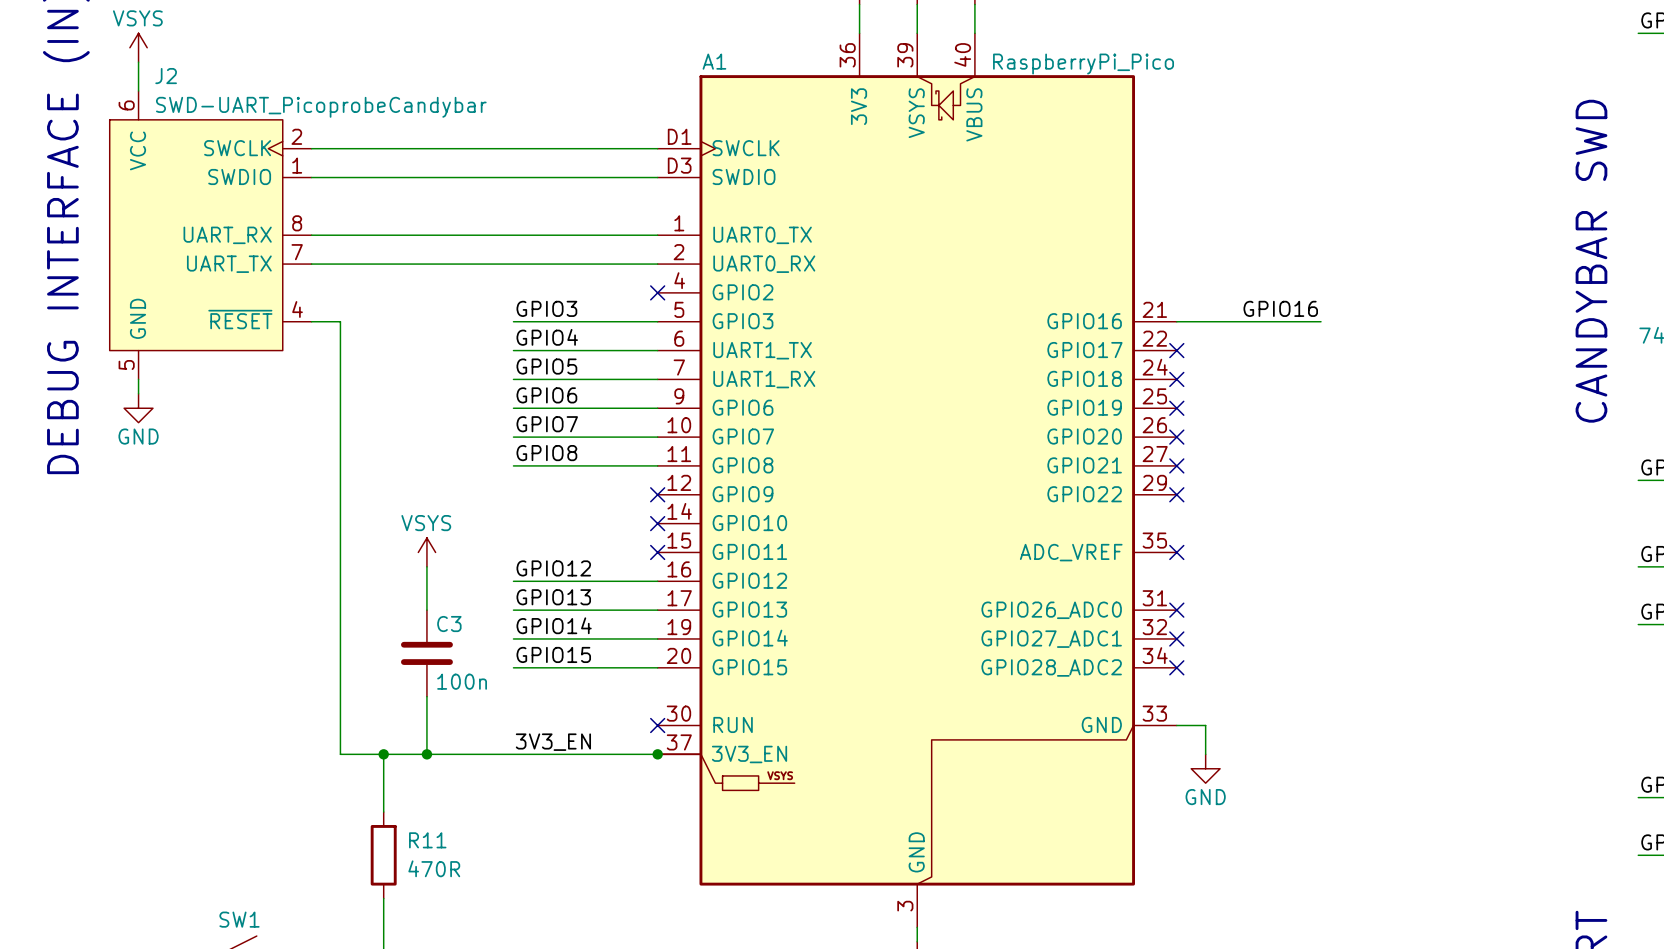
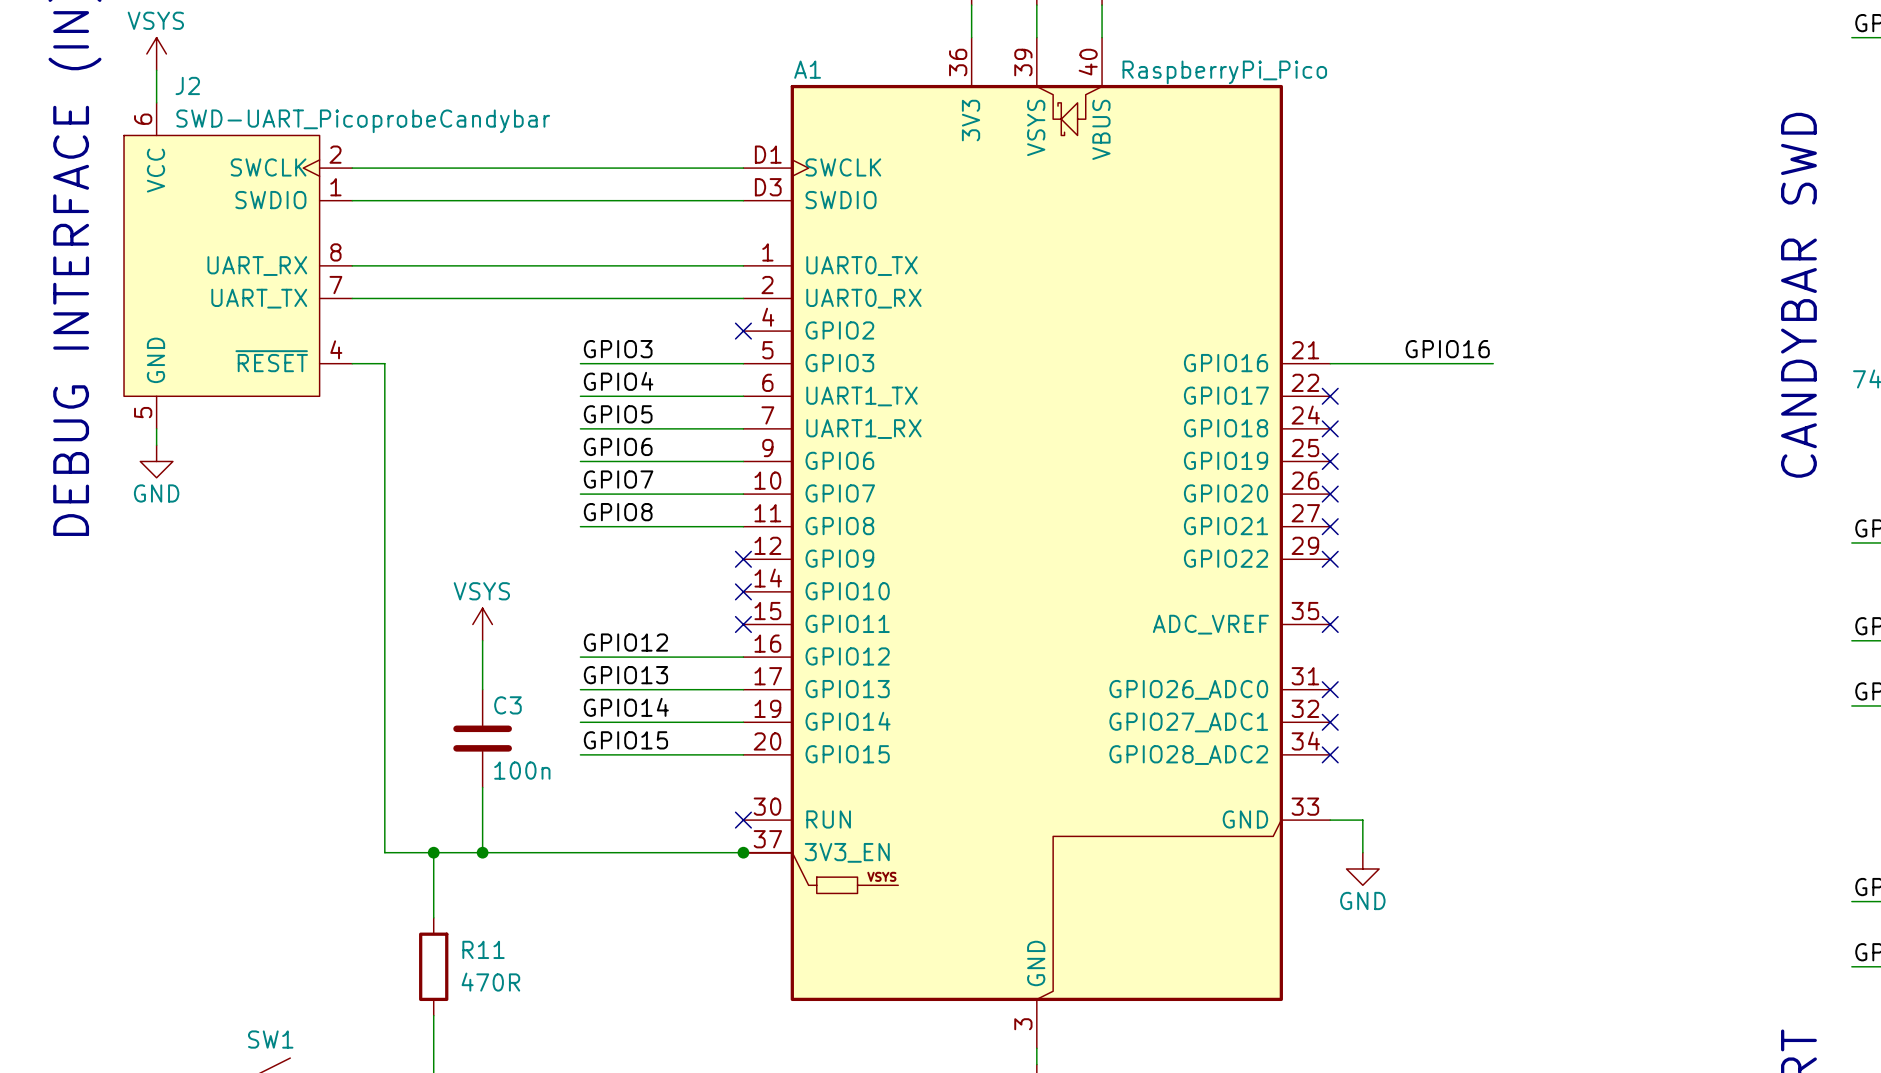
label: 3V3_EN (553, 742) -> none

